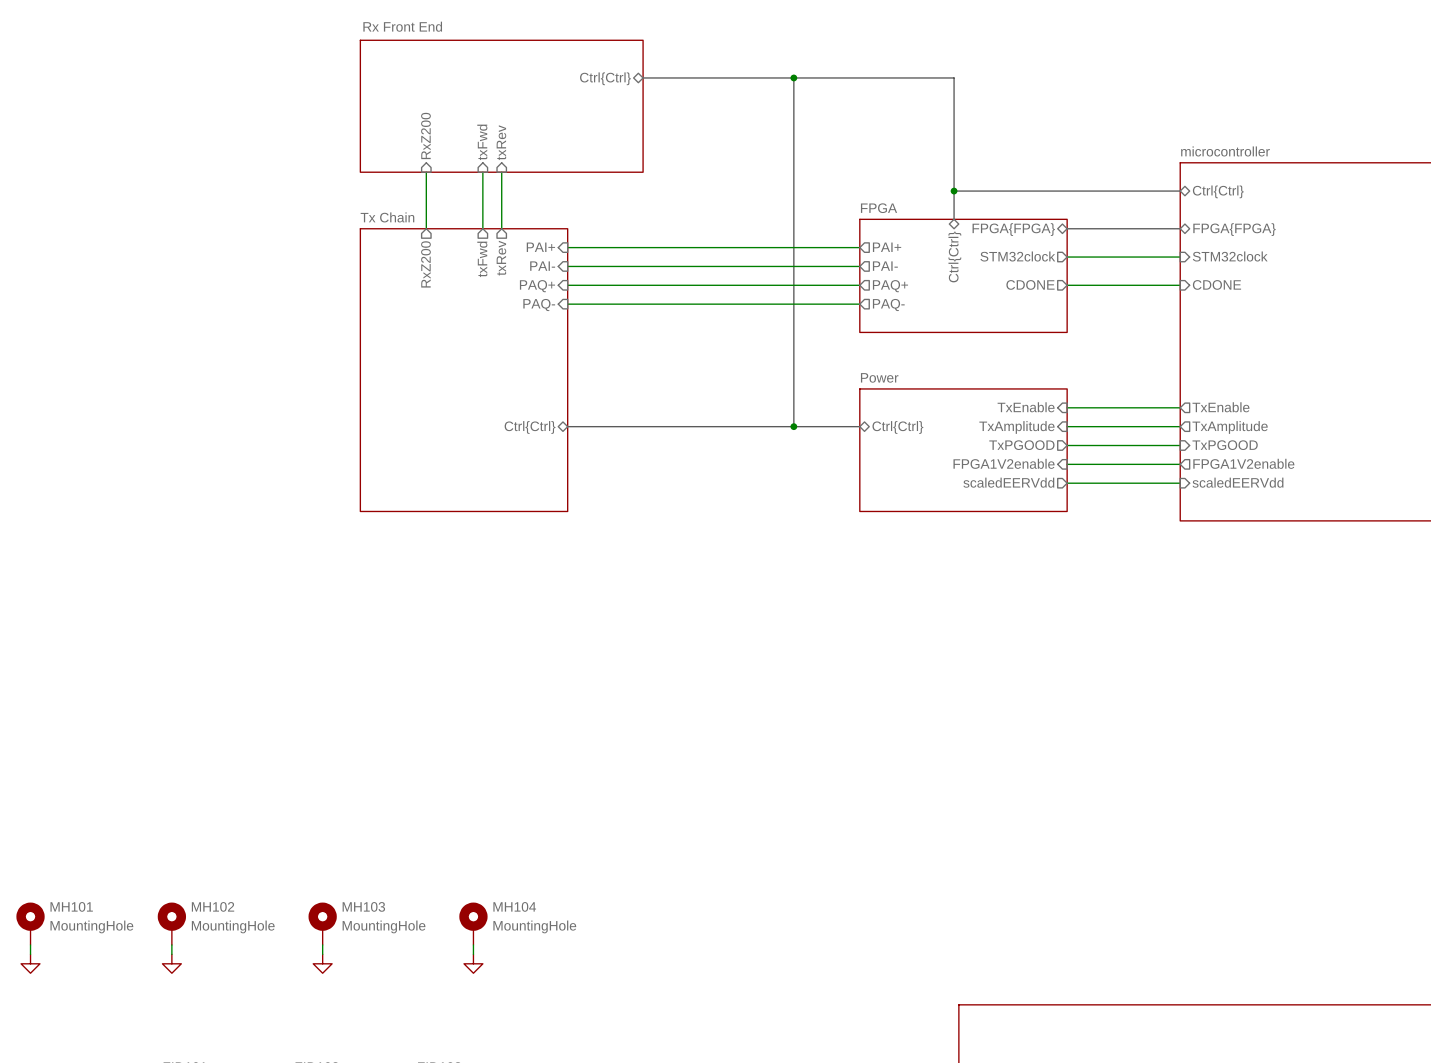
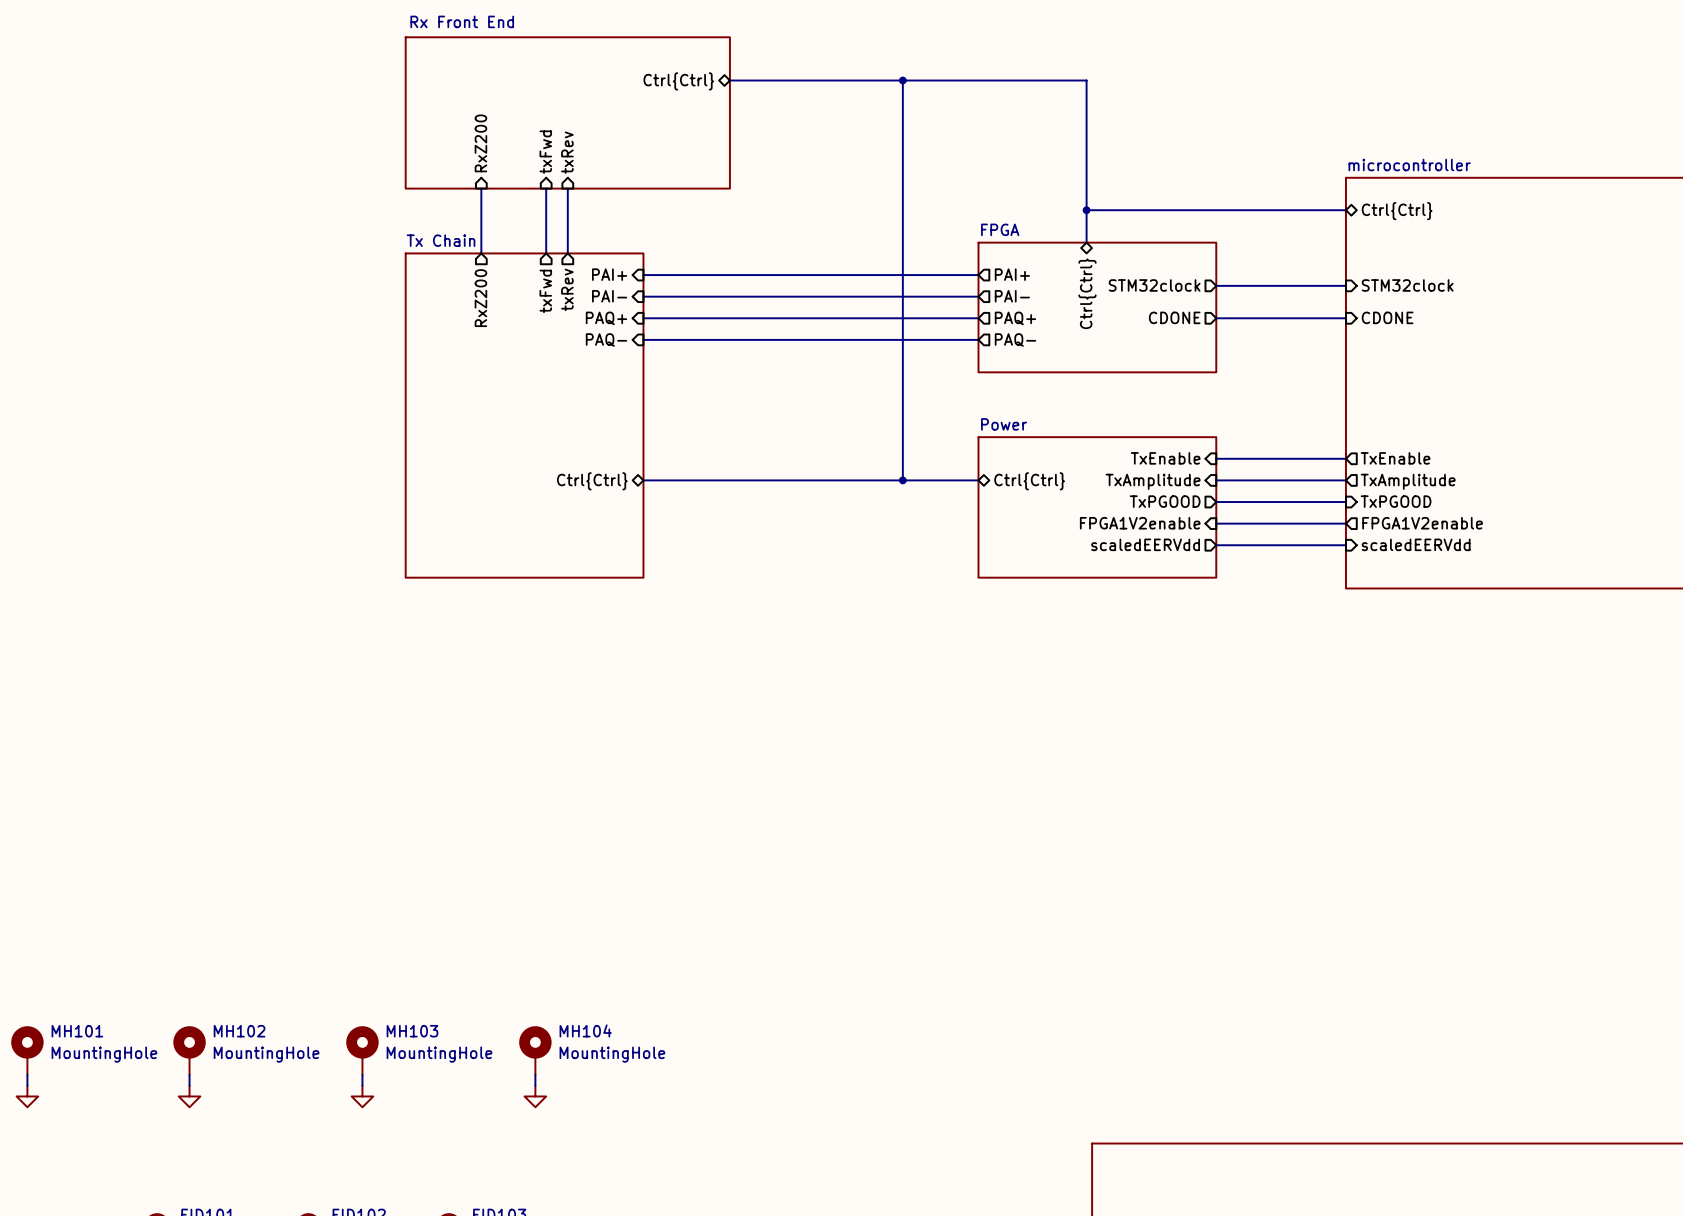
bus: (1067, 228) (1180, 228) -> none
sheet pin: FPGA{FPGA} (1013, 229) -> none
sheet pin: FPGA{FPGA} (1234, 229) -> none

